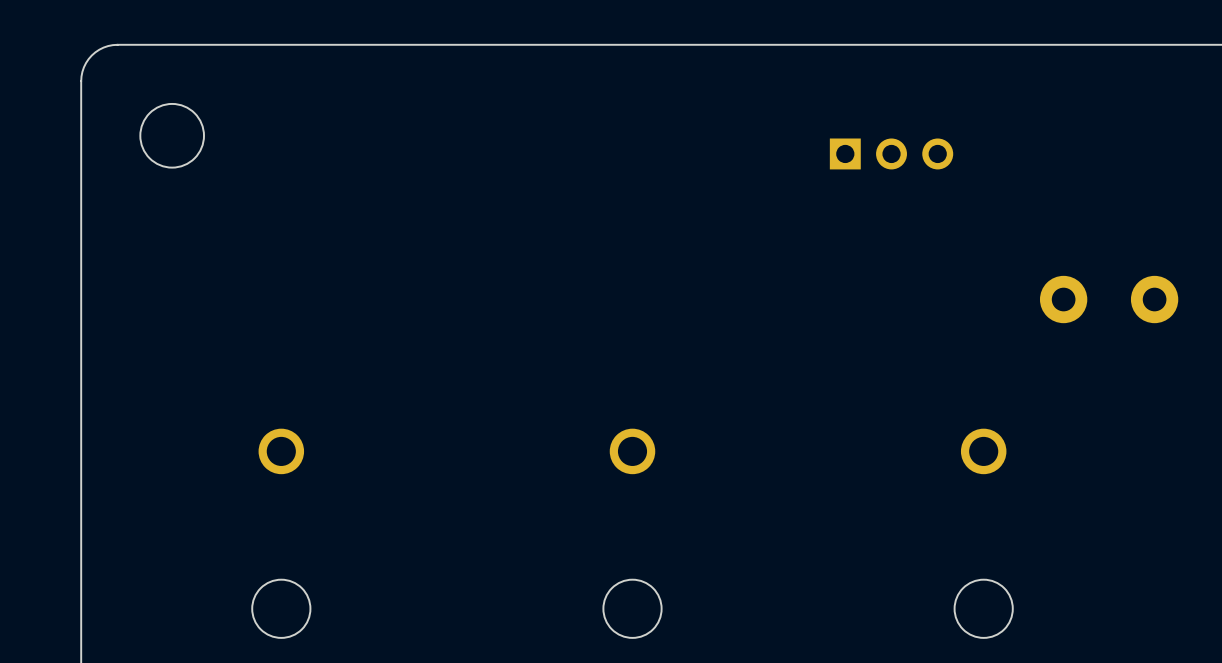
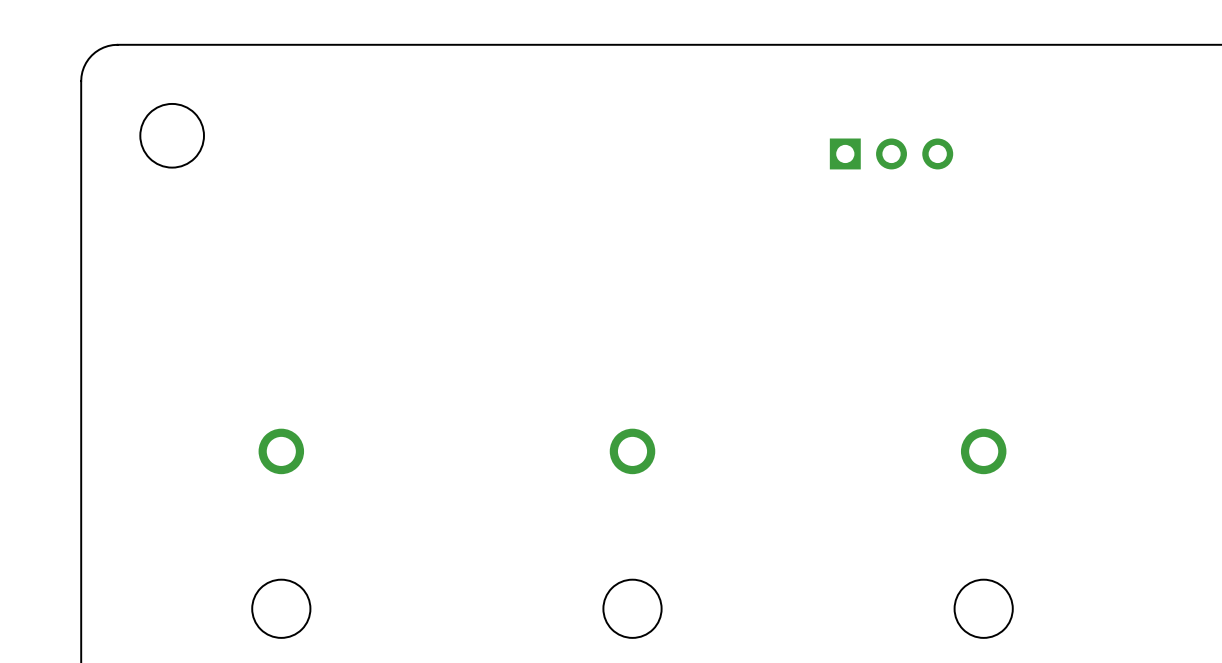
part: (1063, 299) -> none
part: (1154, 299) -> none

